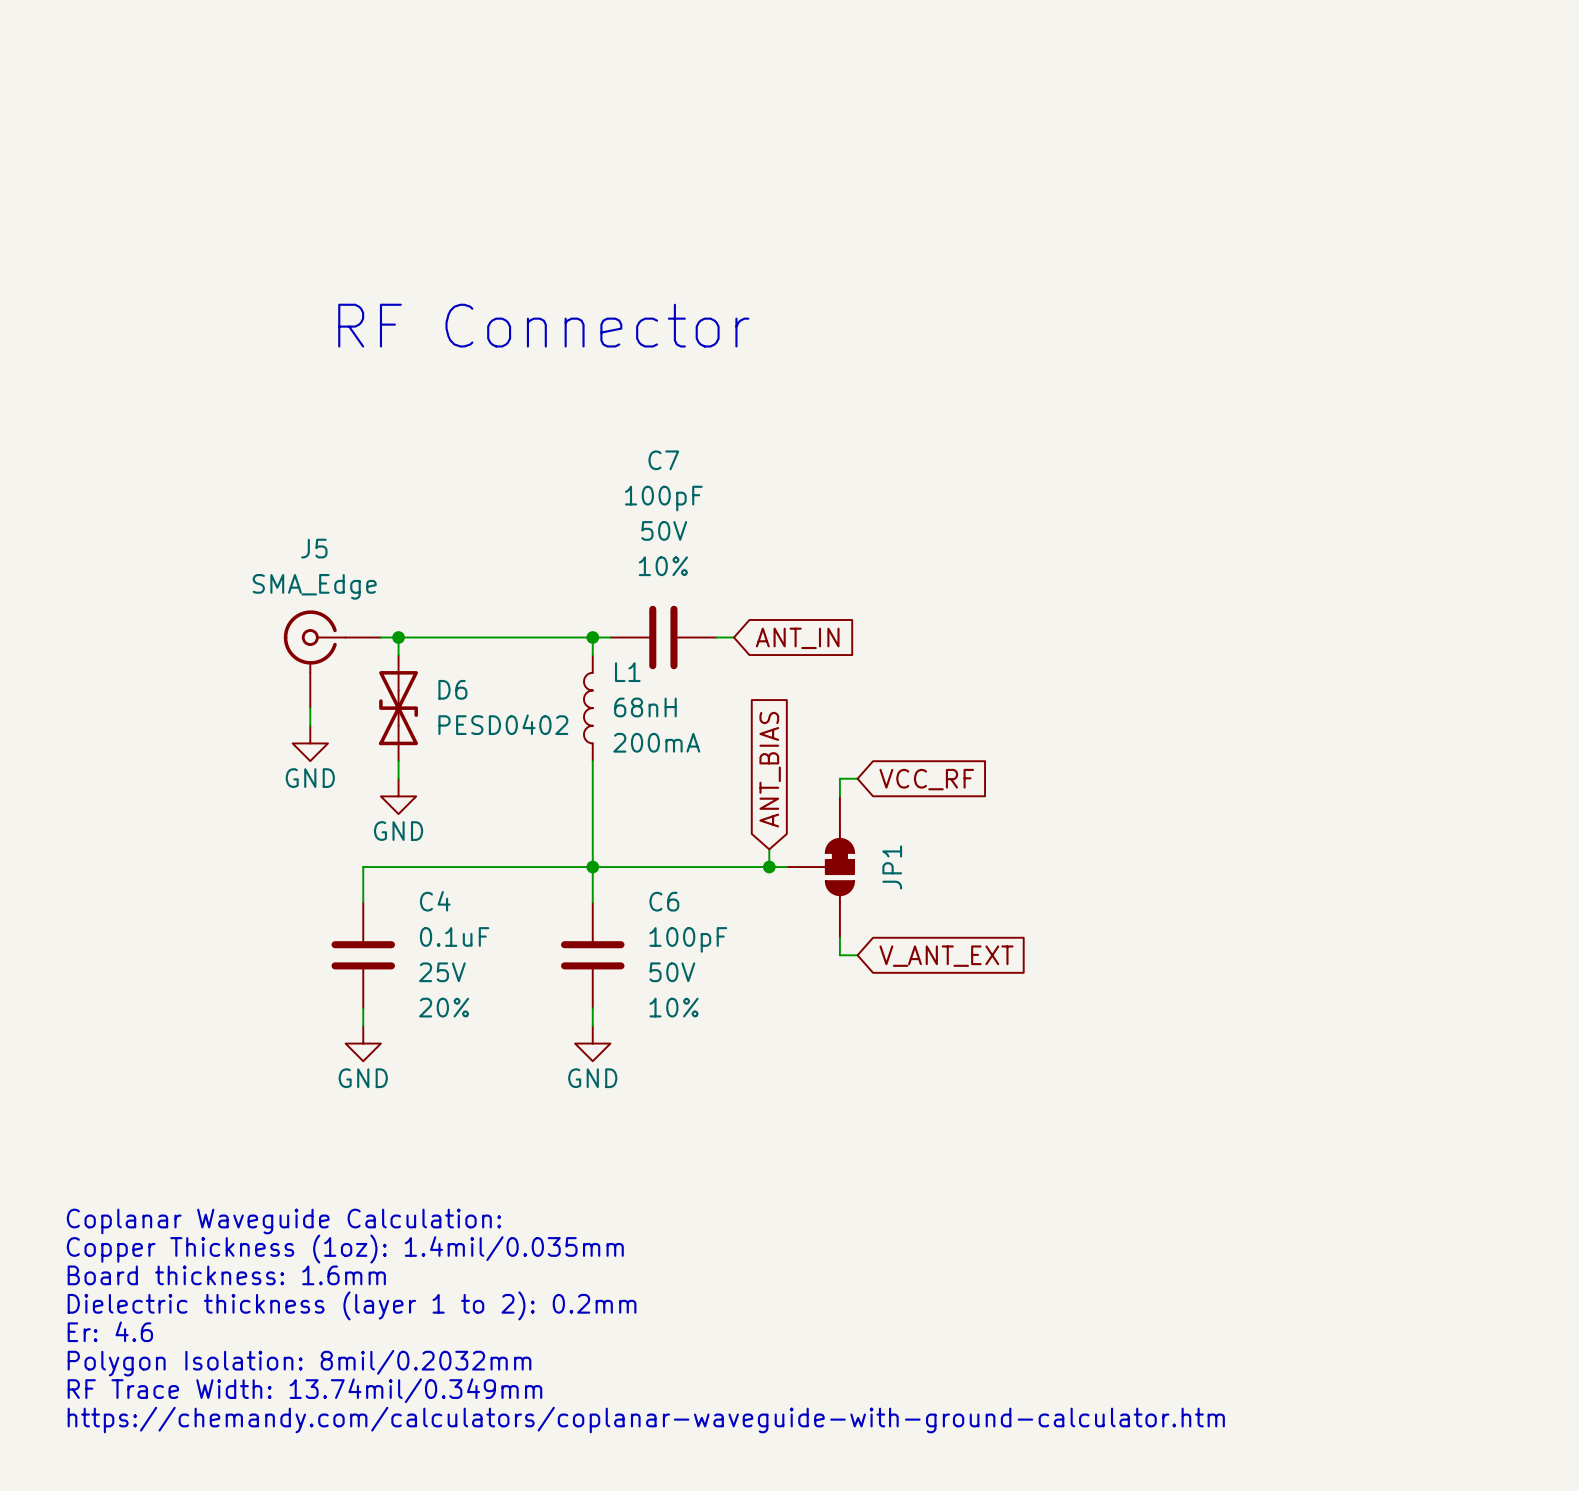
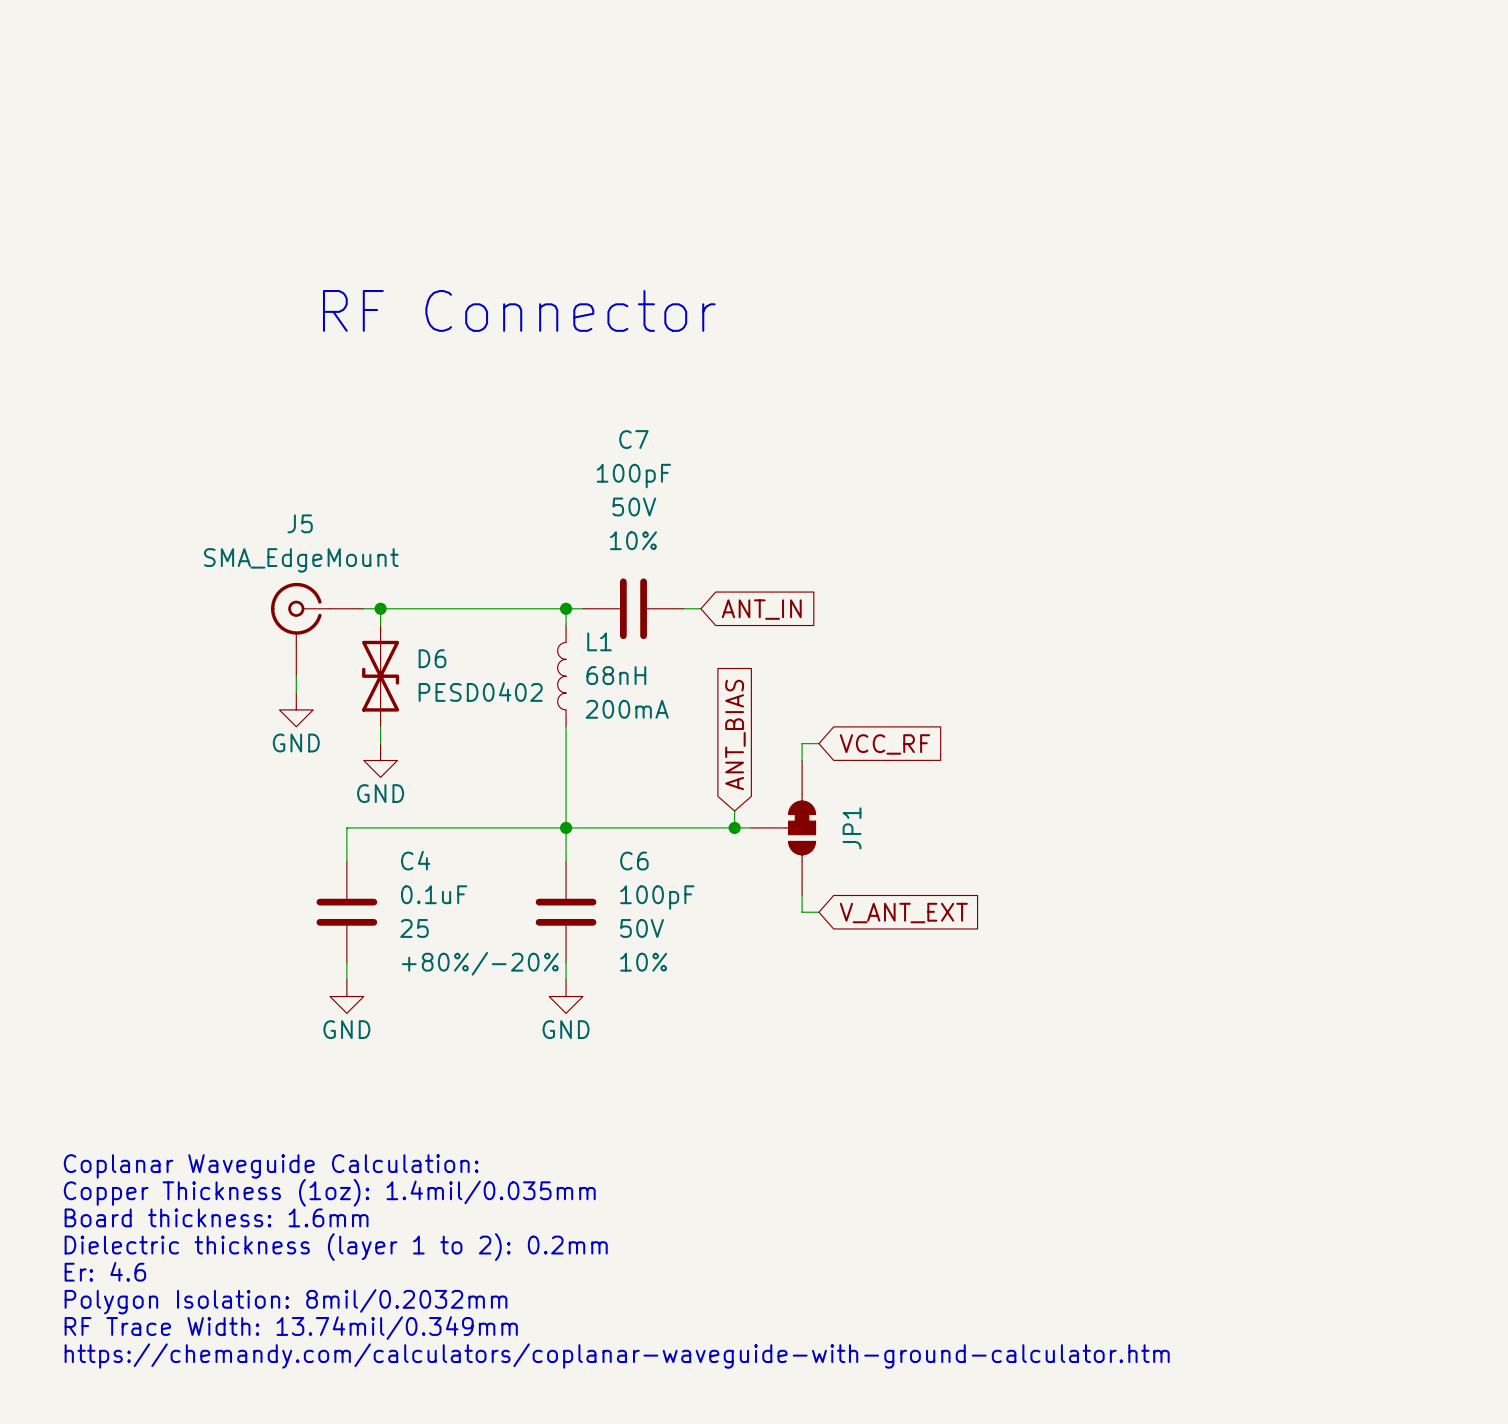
J5 value: SMA_Edge (314, 586) -> SMA_EdgeMount (301, 560)
C4 text: 25V (442, 972) -> 25 (414, 928)
C4 text: 20% (444, 1007) -> +80%/-20% (480, 963)

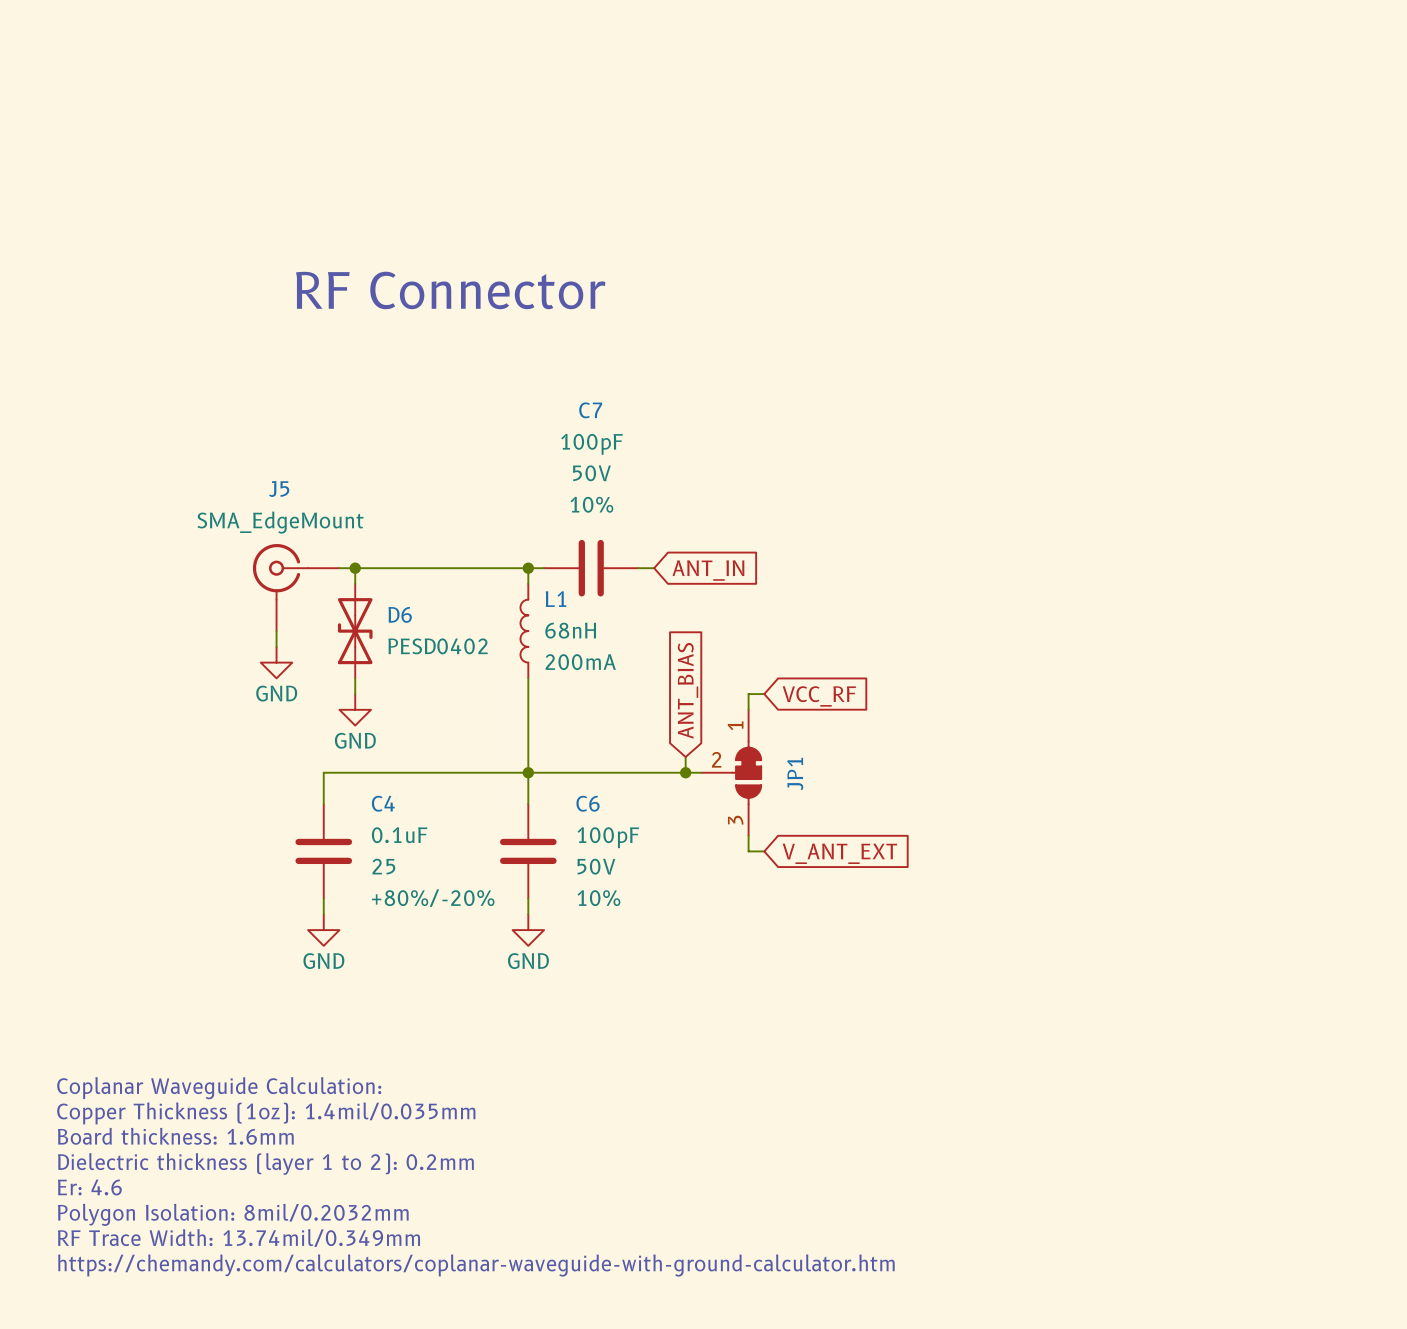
JP1 pin number: none -> 1 (735, 725)
JP1 pin number: none -> 2 (716, 759)
JP1 pin number: none -> 3 (735, 820)

